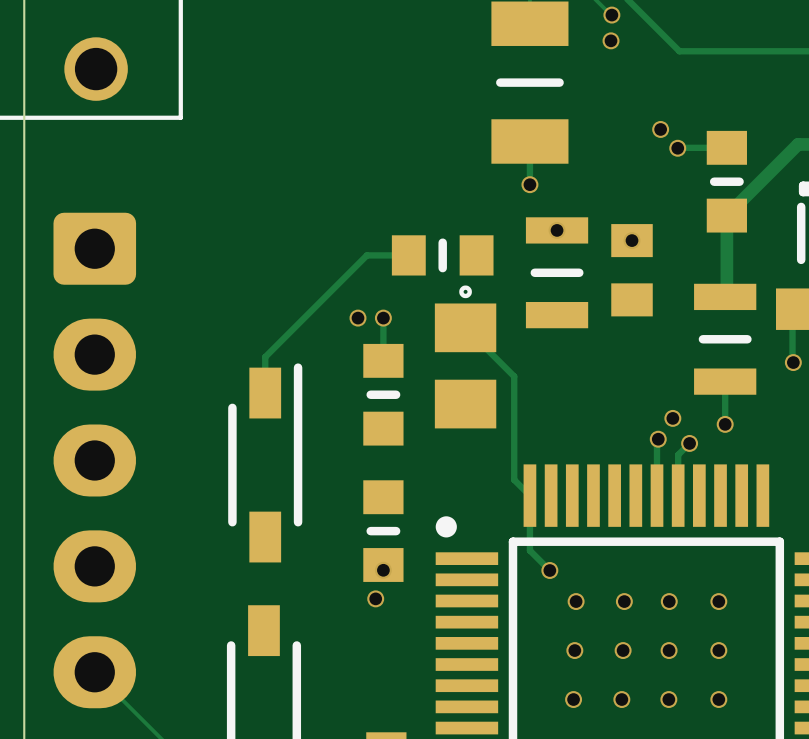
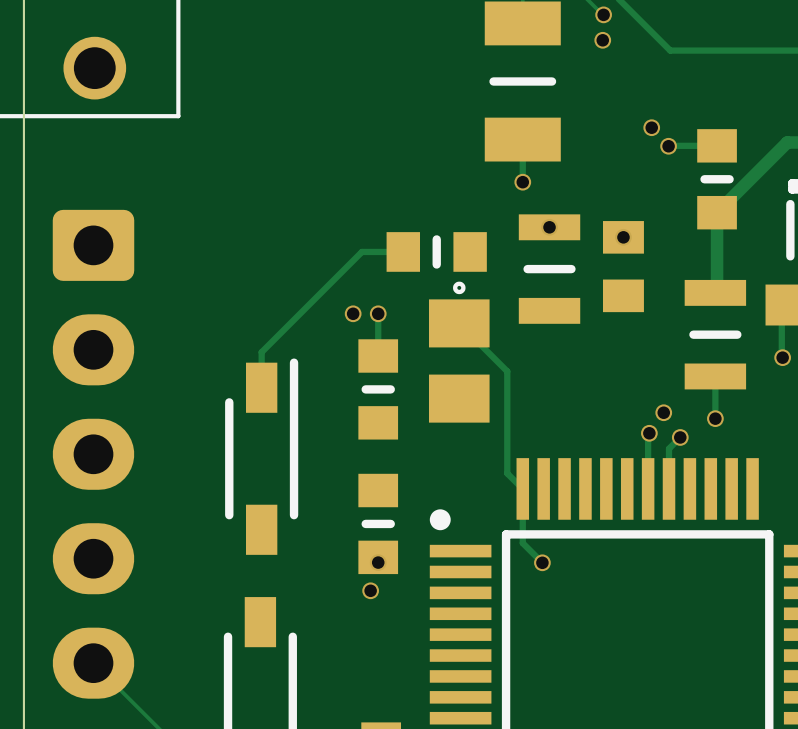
via: (576, 601) -> none
via: (624, 601) -> none
via: (669, 601) -> none
via: (718, 601) -> none
via: (574, 650) -> none
via: (623, 650) -> none
via: (669, 650) -> none
via: (718, 650) -> none
via: (573, 699) -> none
via: (621, 699) -> none
via: (668, 699) -> none
via: (718, 699) -> none

